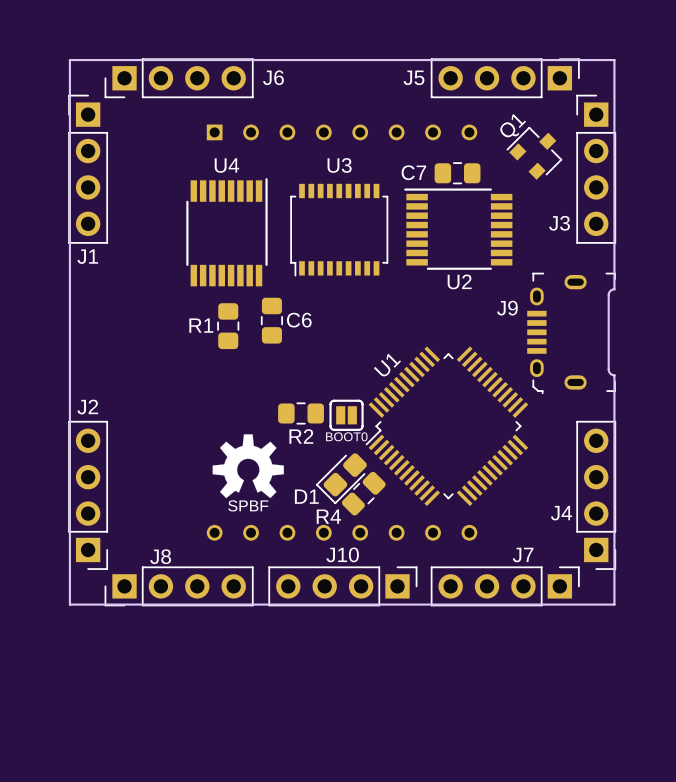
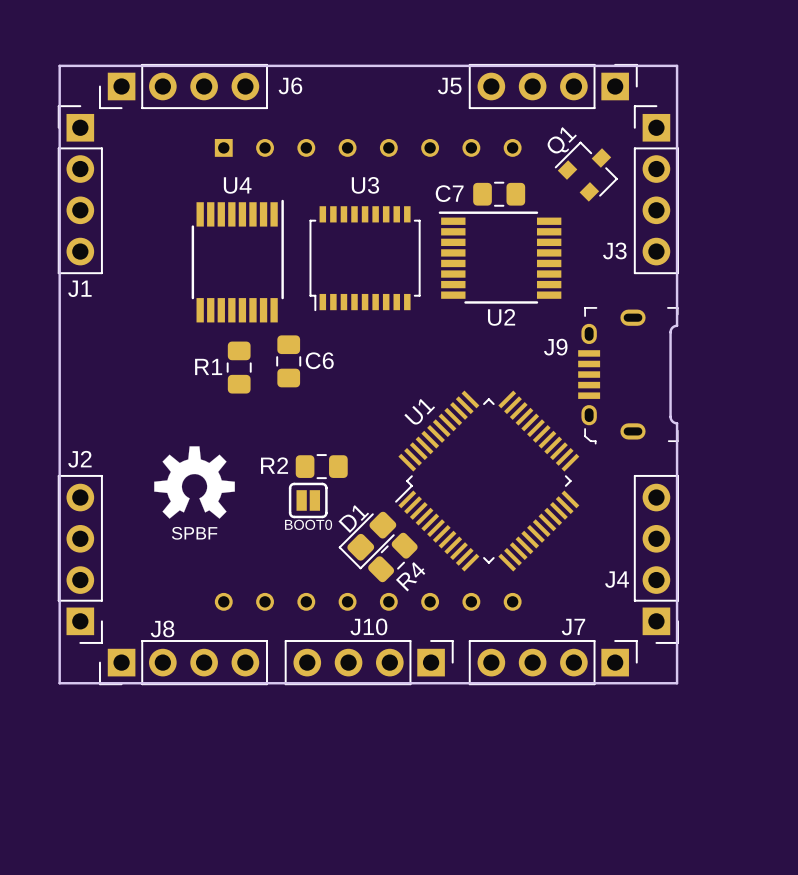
BOOT0 position: (346, 415) -> (308, 500)
R2 name position: R2 (301, 436) -> R2 (274, 465)
drawing position: (248, 466) -> (194, 482)
D1 name rotation: 0° (306, 496) -> 45° counterclockwise (353, 519)
D1 name position: D1 (306, 496) -> D1 (353, 519)
text position: SPBF (248, 505) -> SPBF (194, 533)
R4 name rotation: 0° (328, 516) -> 45° counterclockwise (410, 576)
R4 name position: R4 (328, 516) -> R4 (410, 576)

